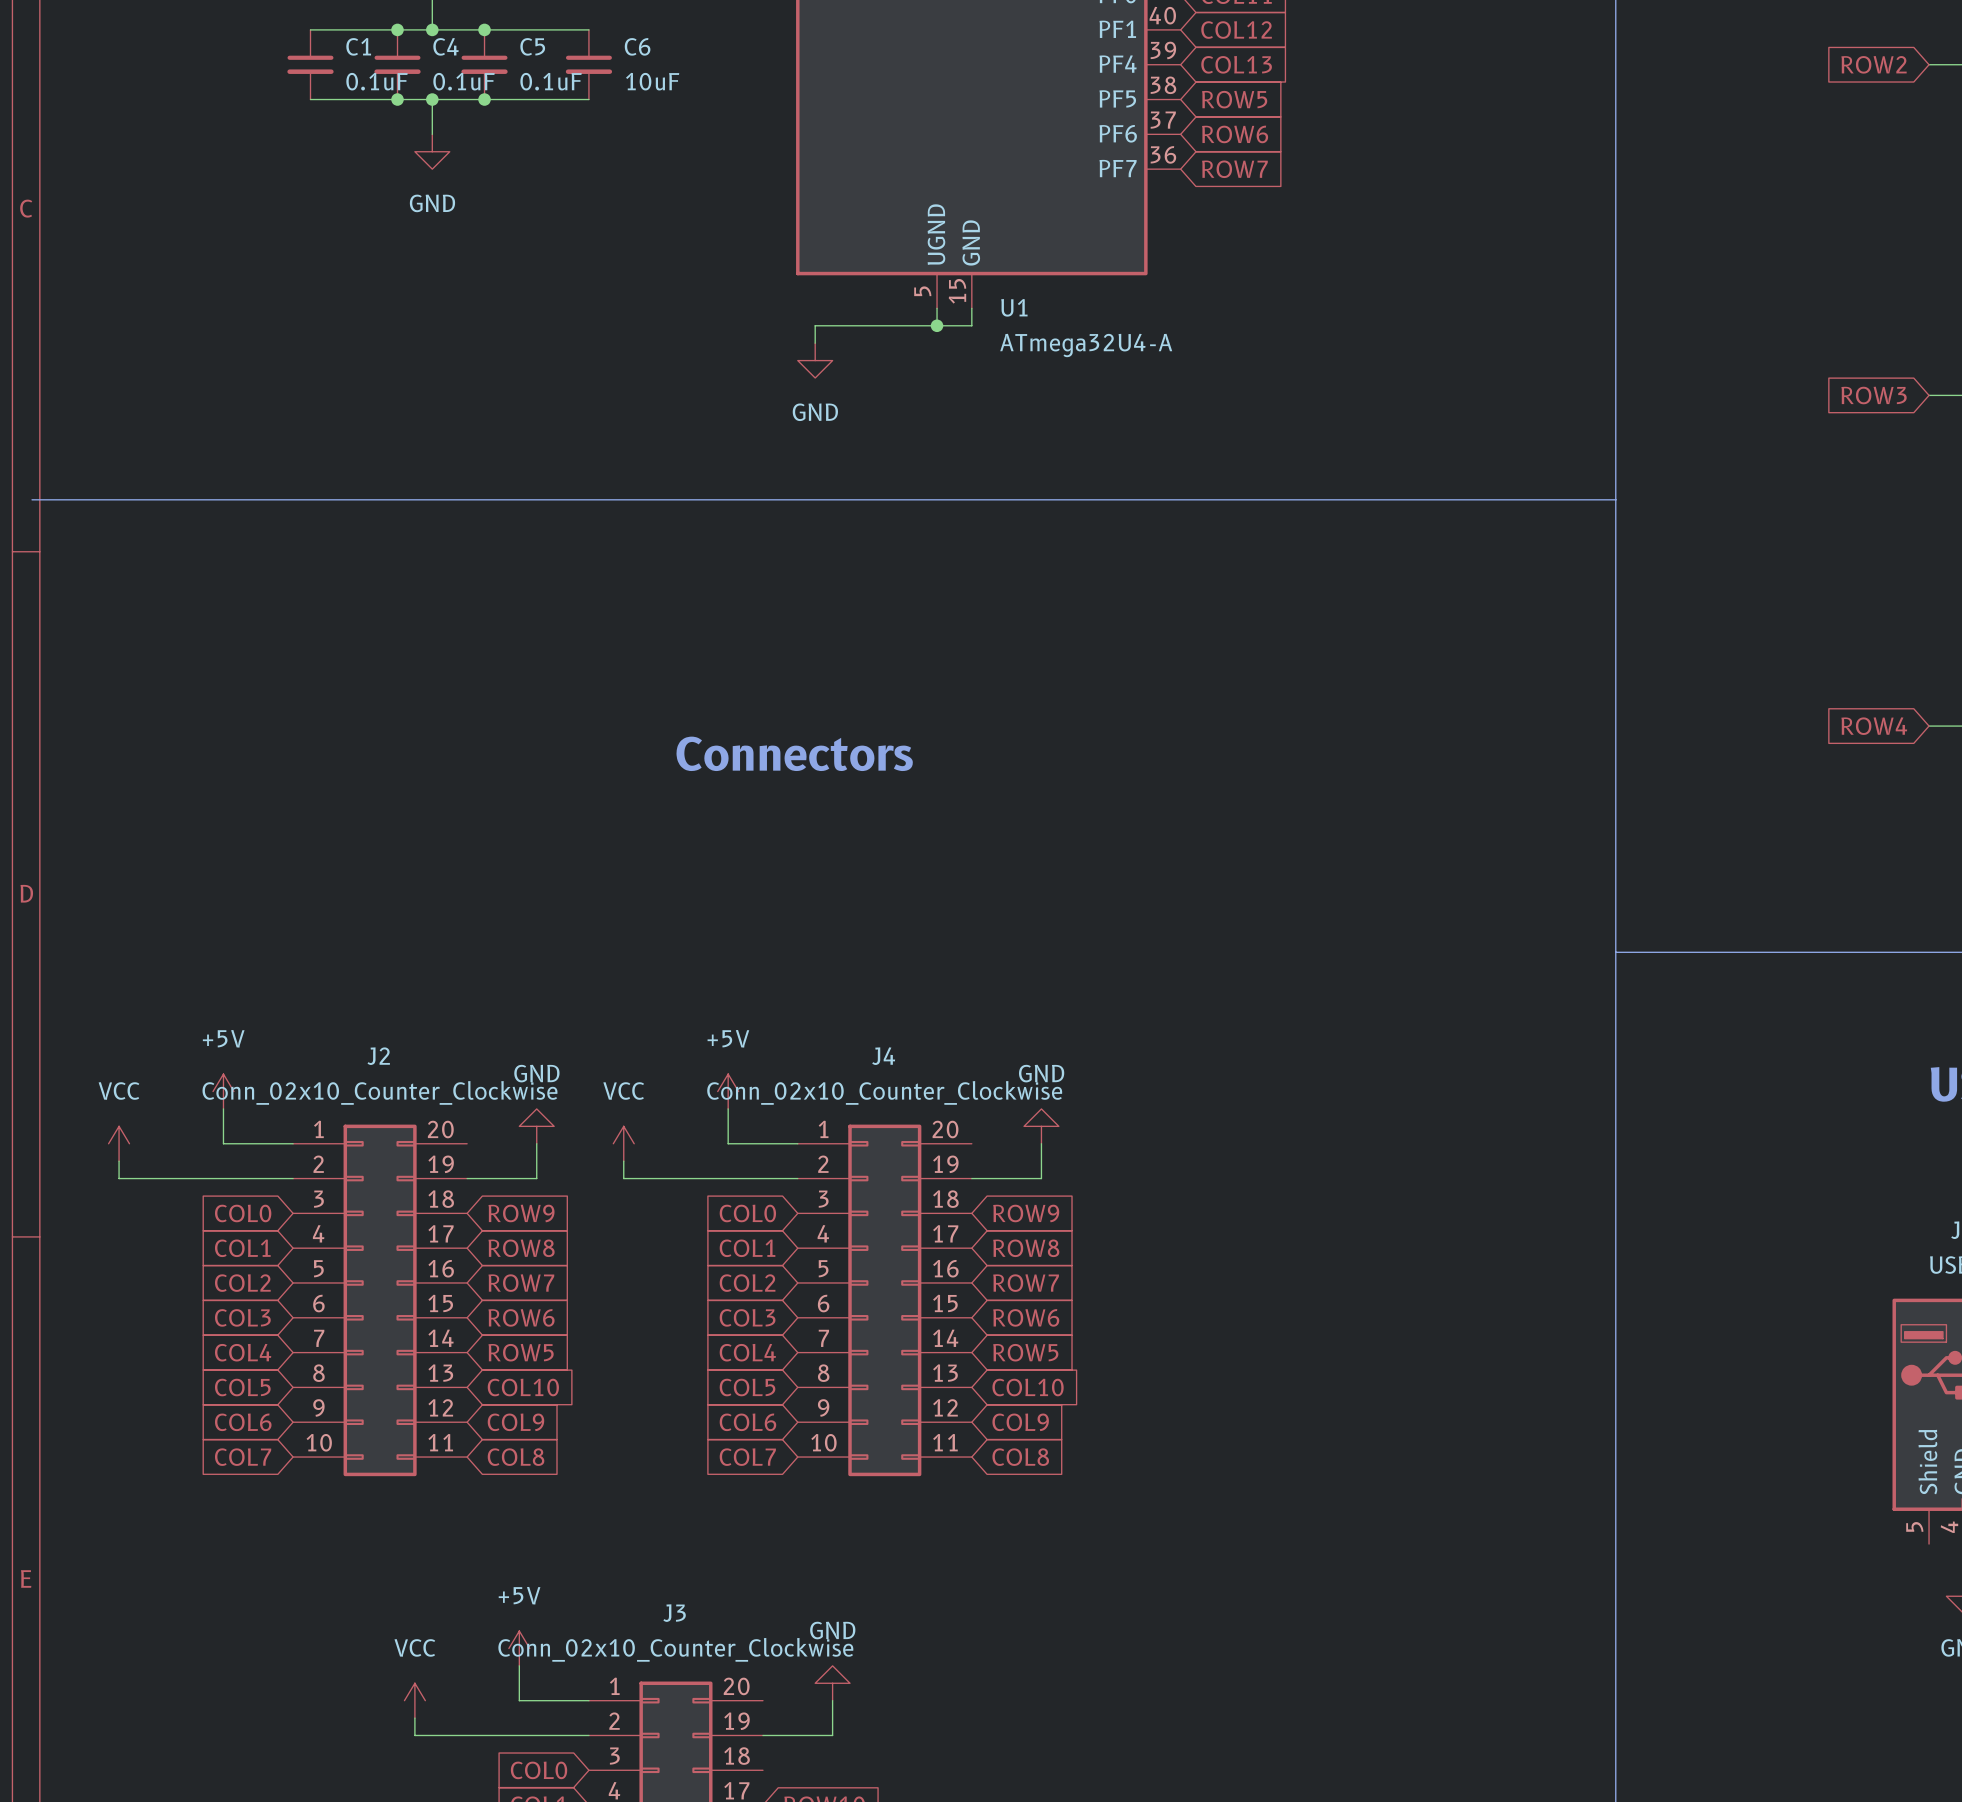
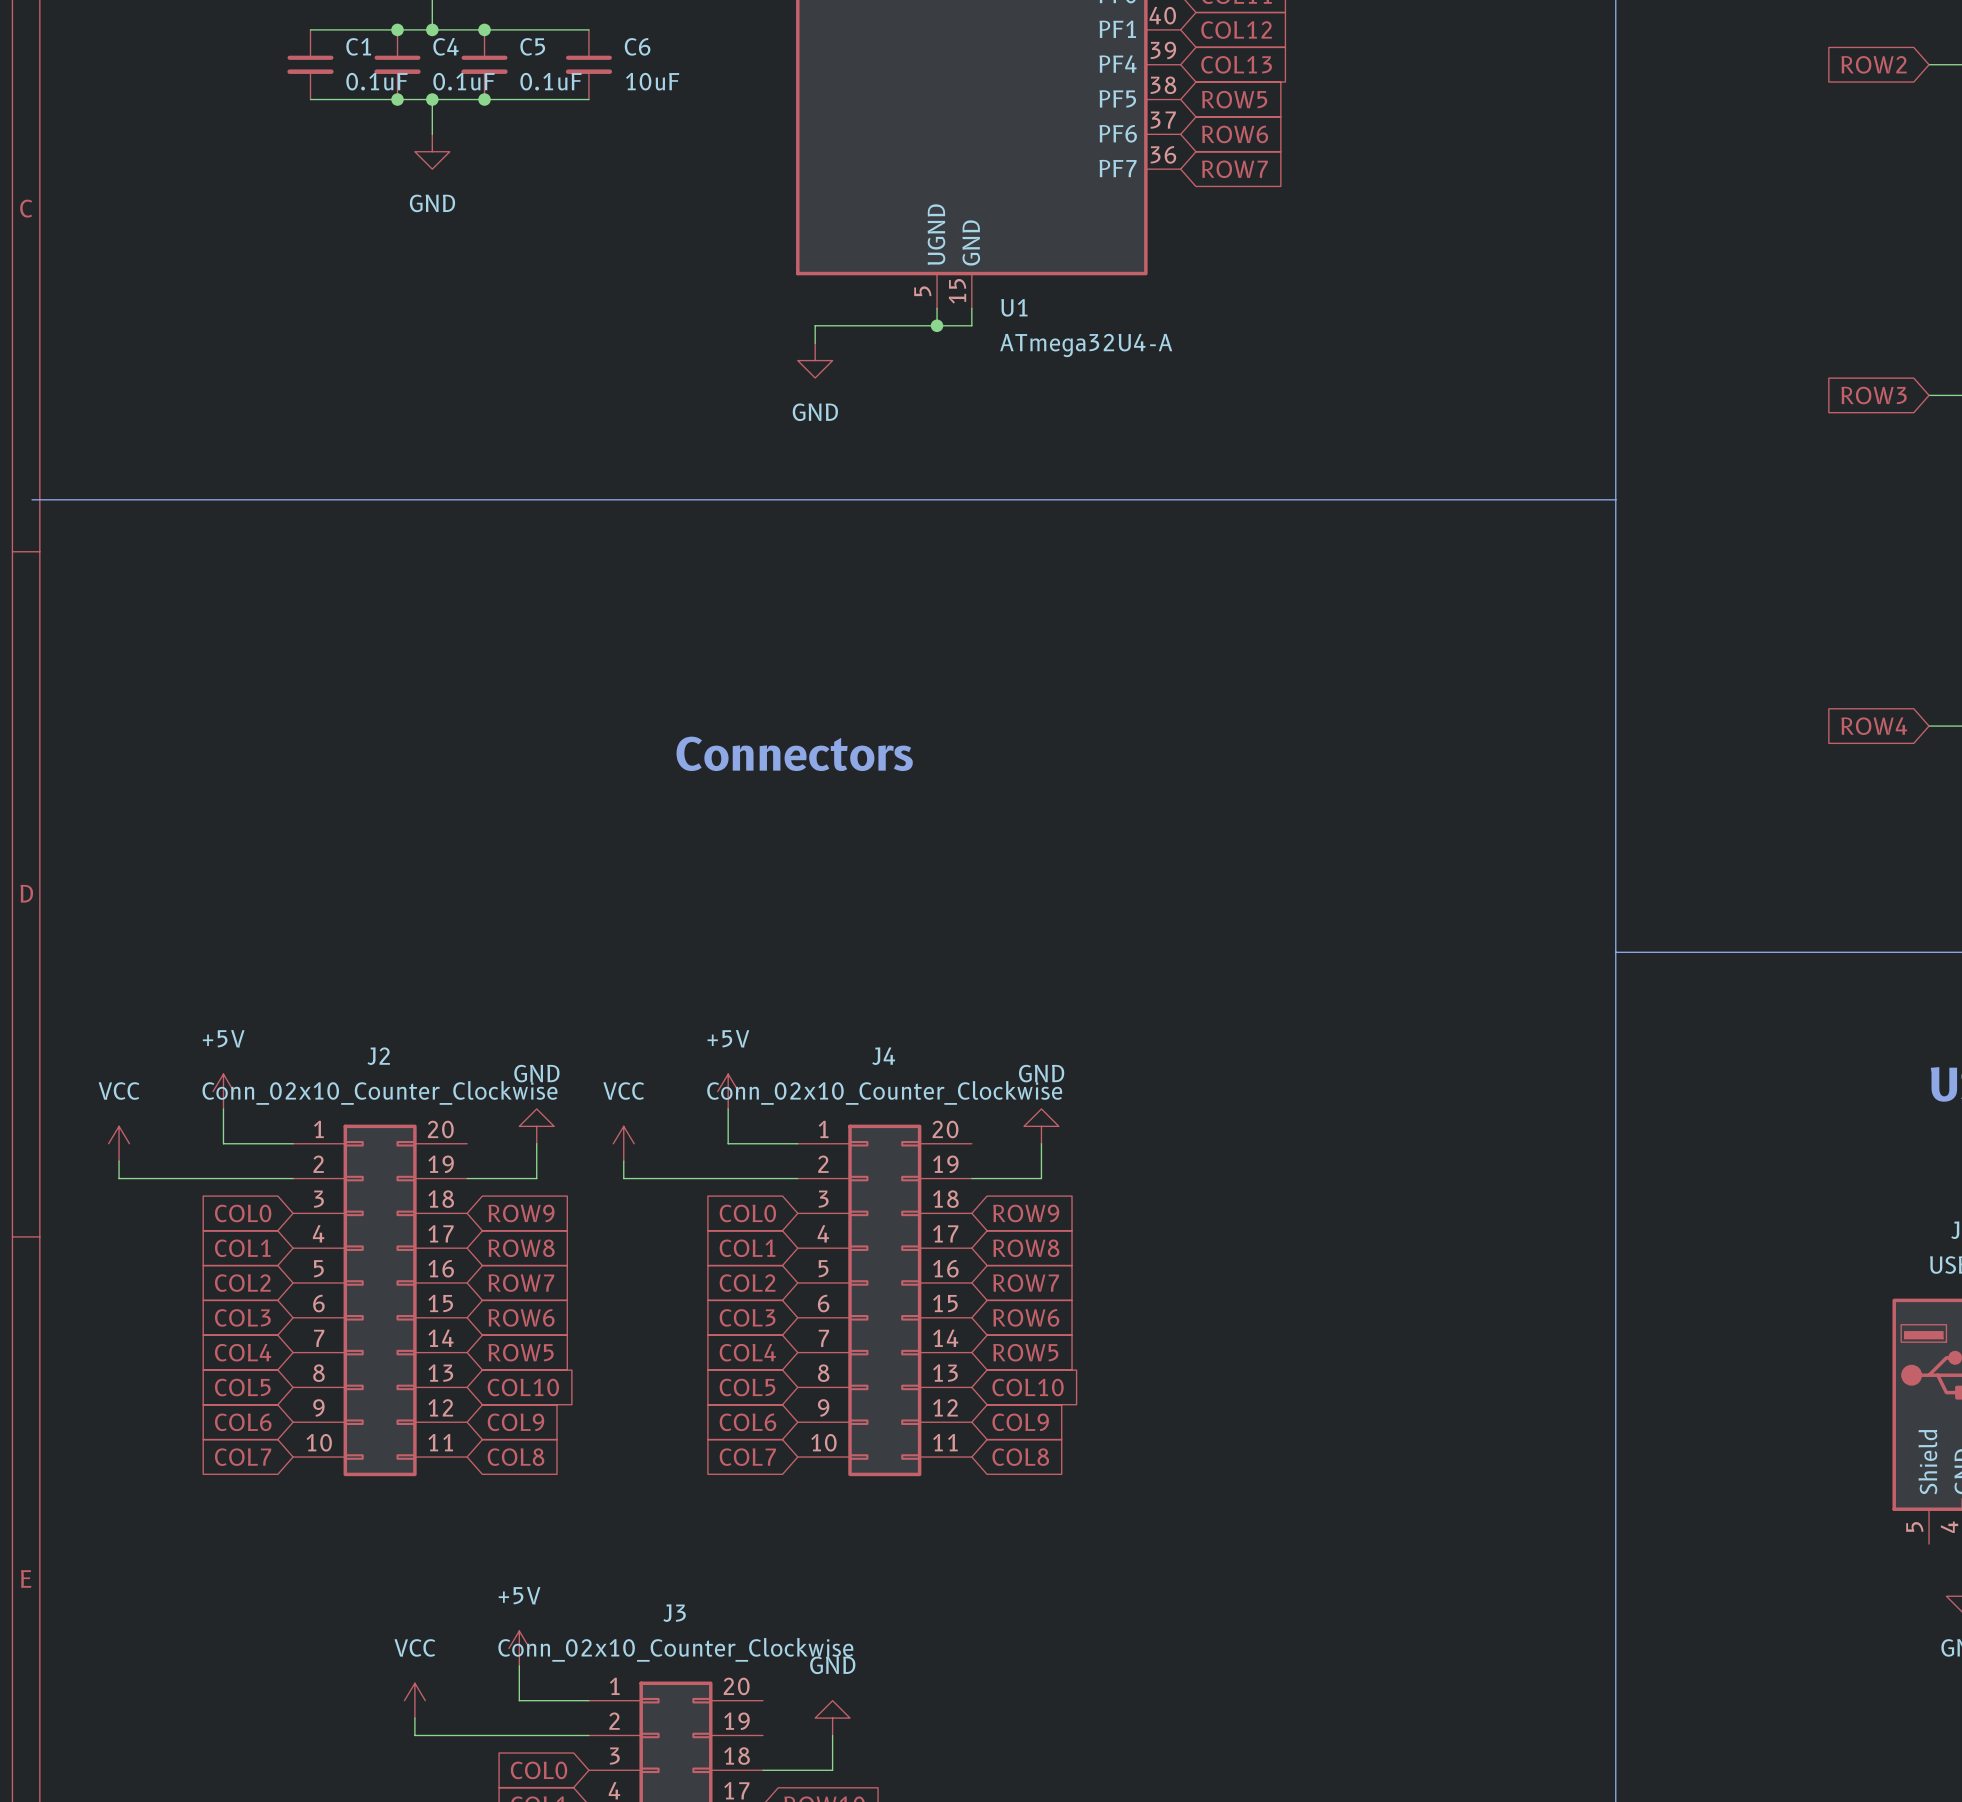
power symbol position: GND (832, 1683) -> GND (832, 1718)
wire: (832, 1700) (832, 1735) (762, 1735) -> (832, 1735) (832, 1770) (762, 1770)

